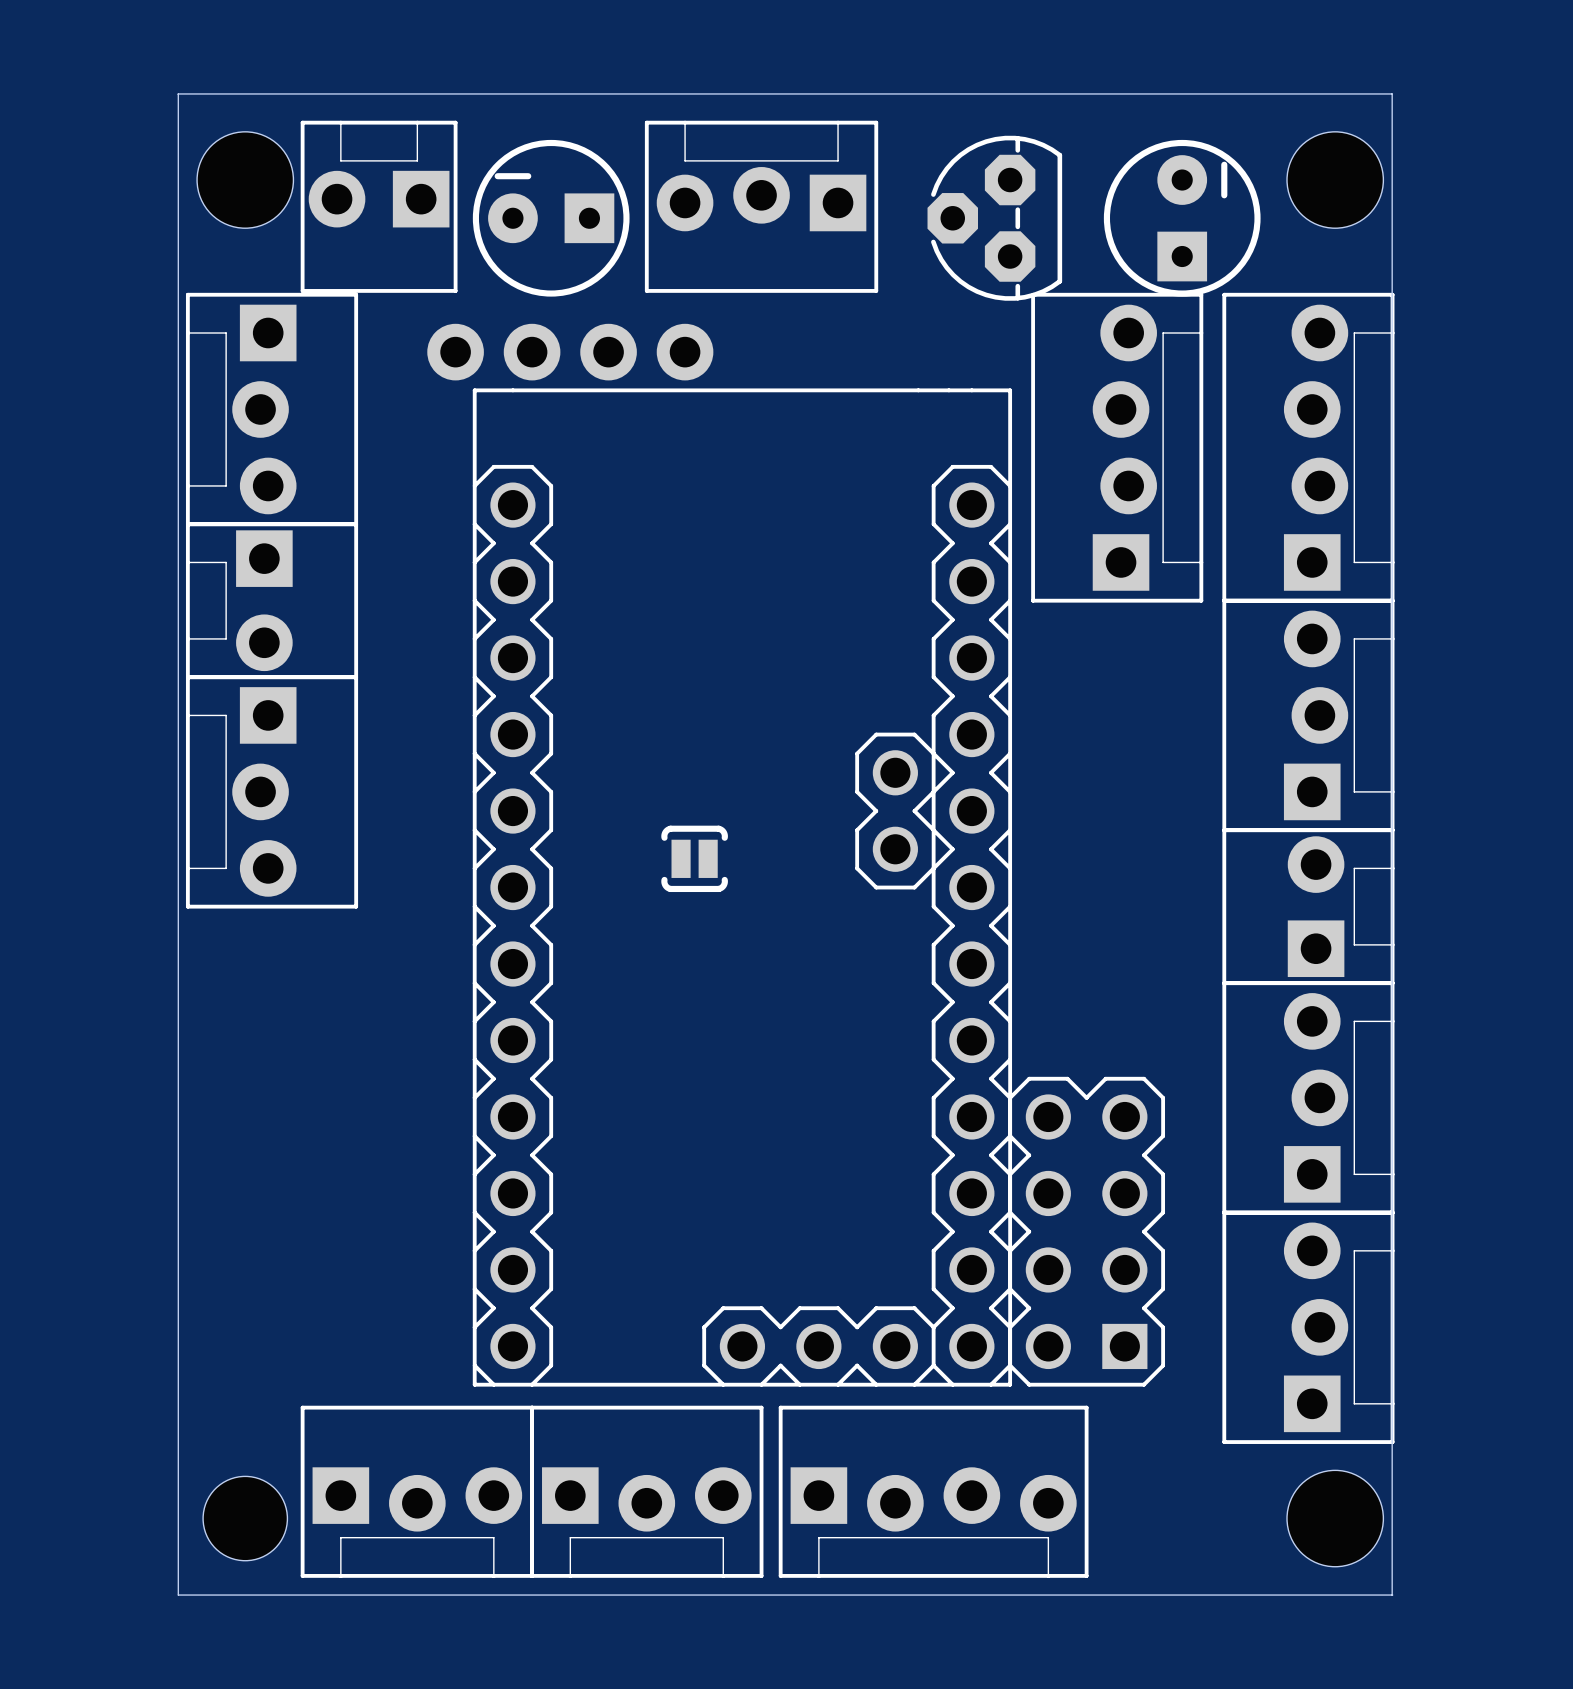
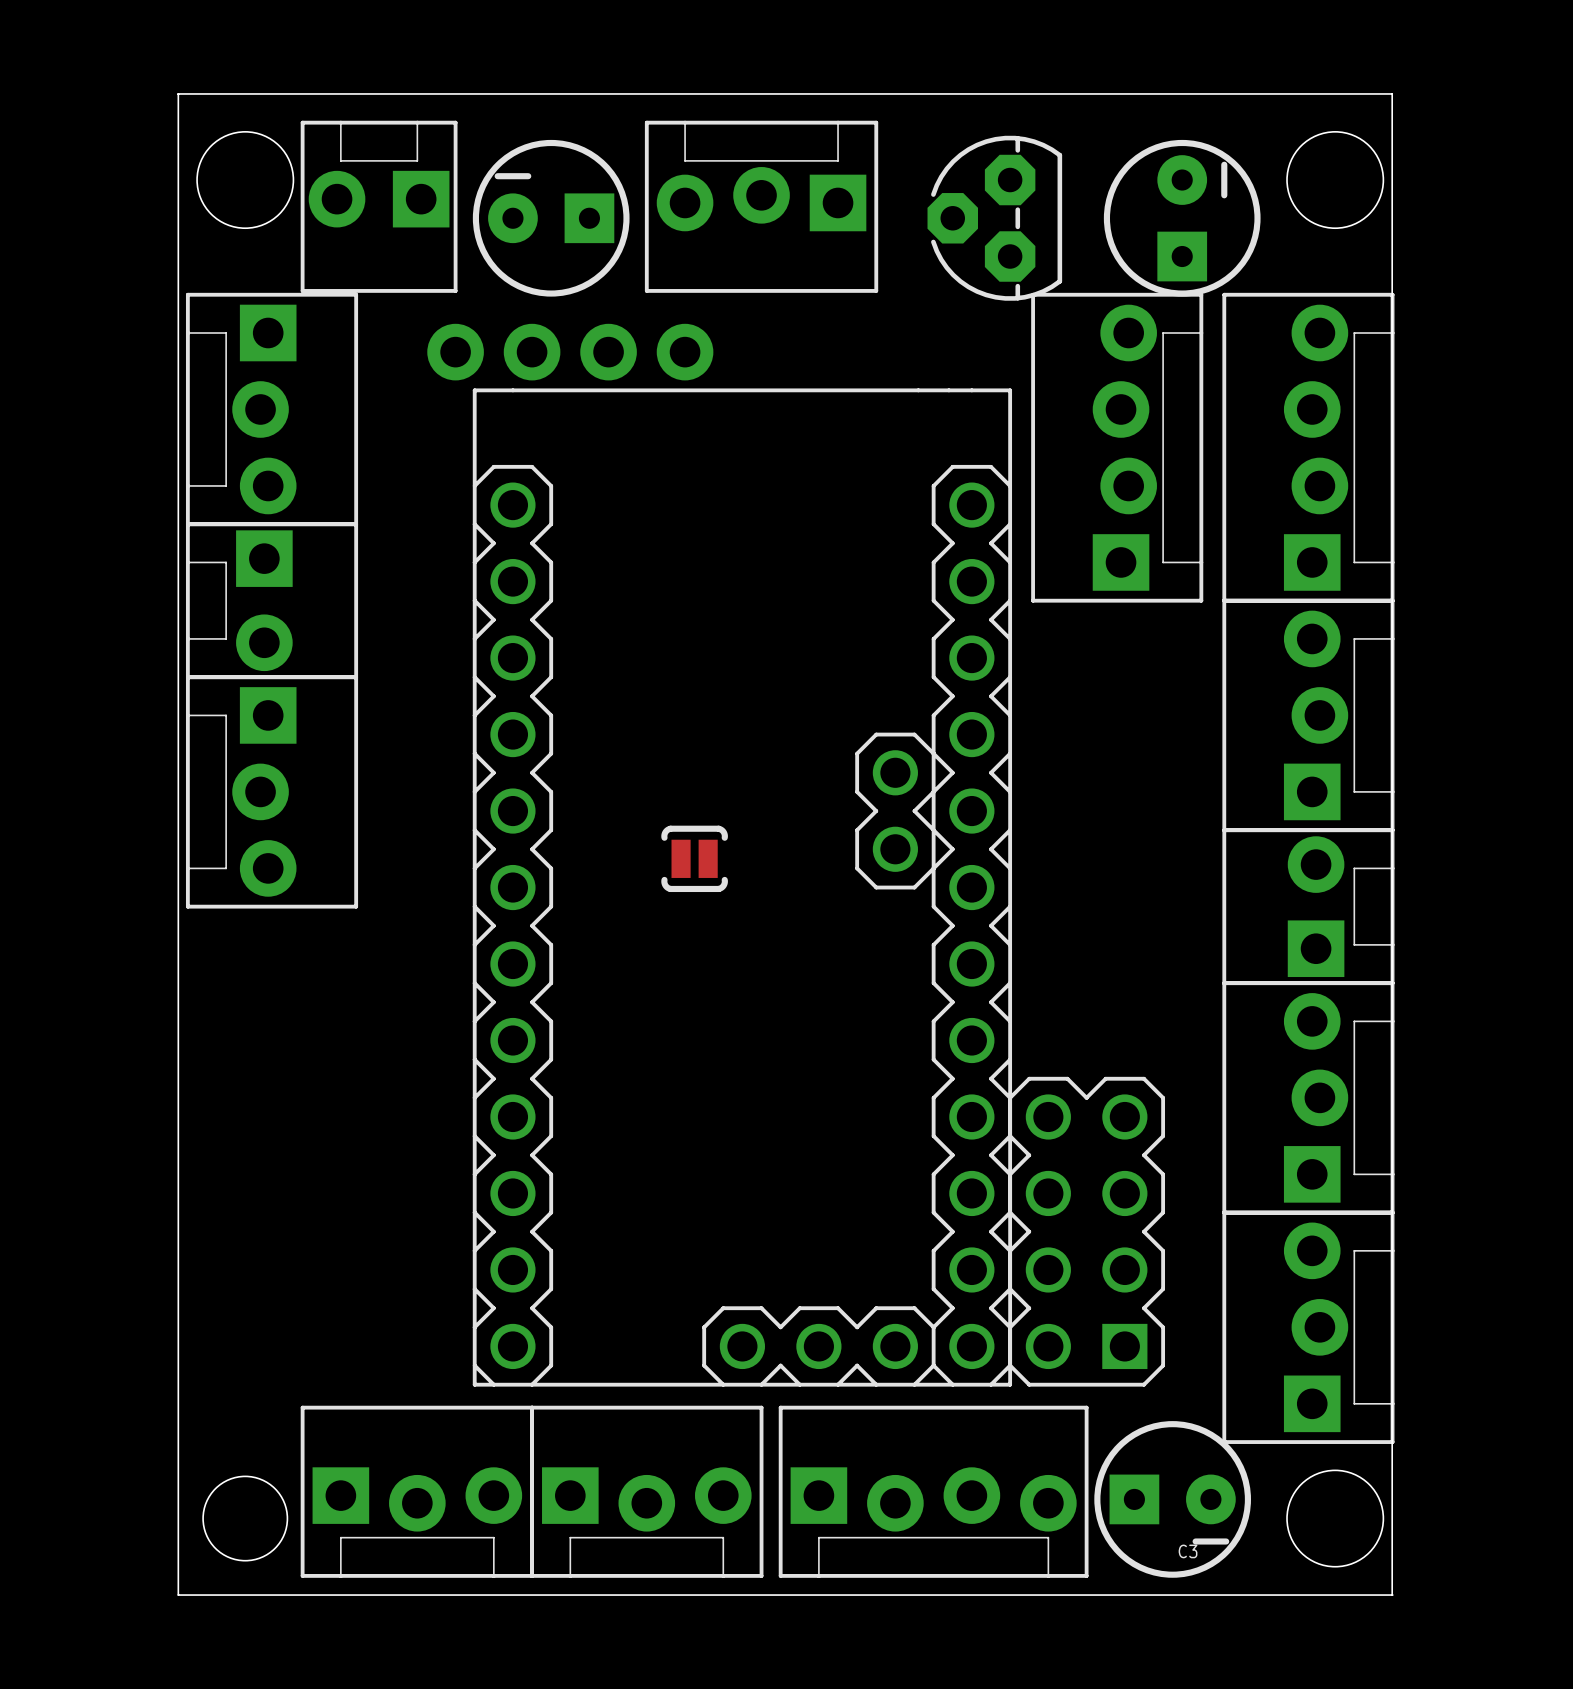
C3: none -> (1172, 1499)

